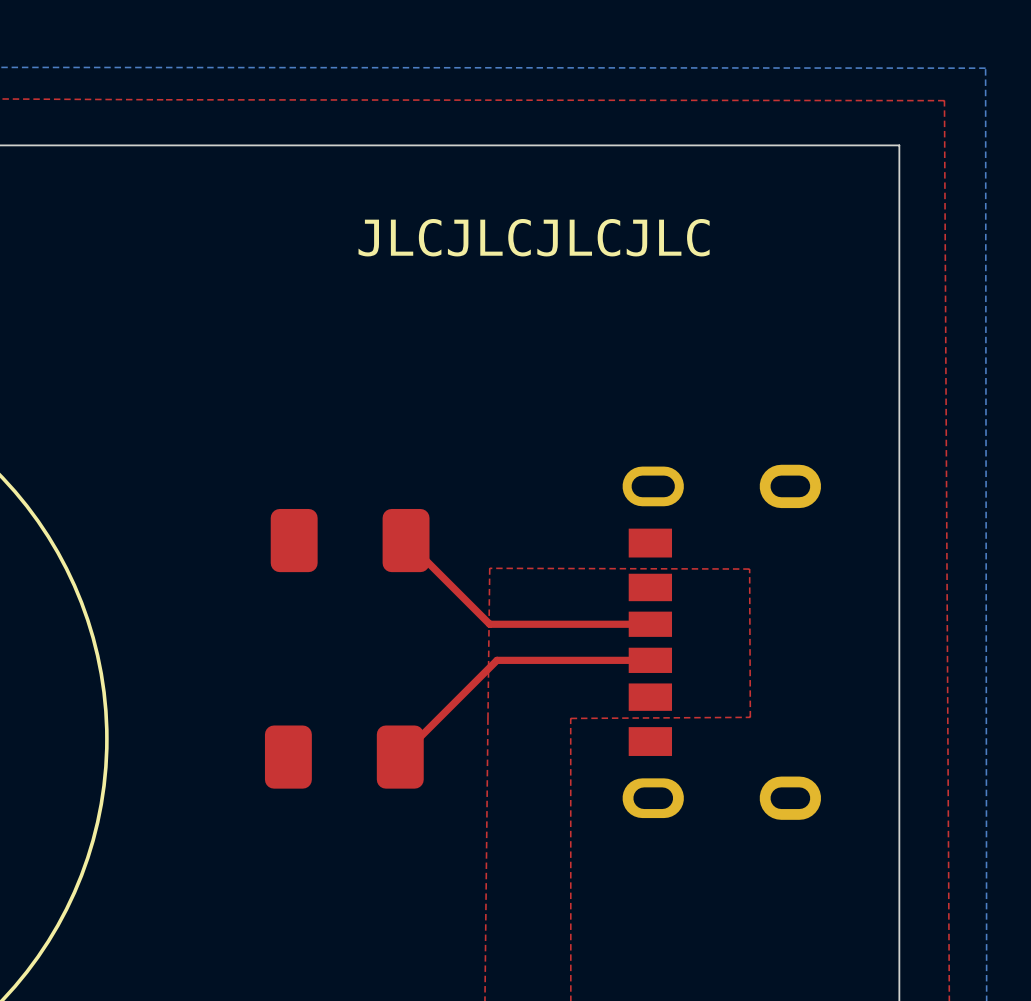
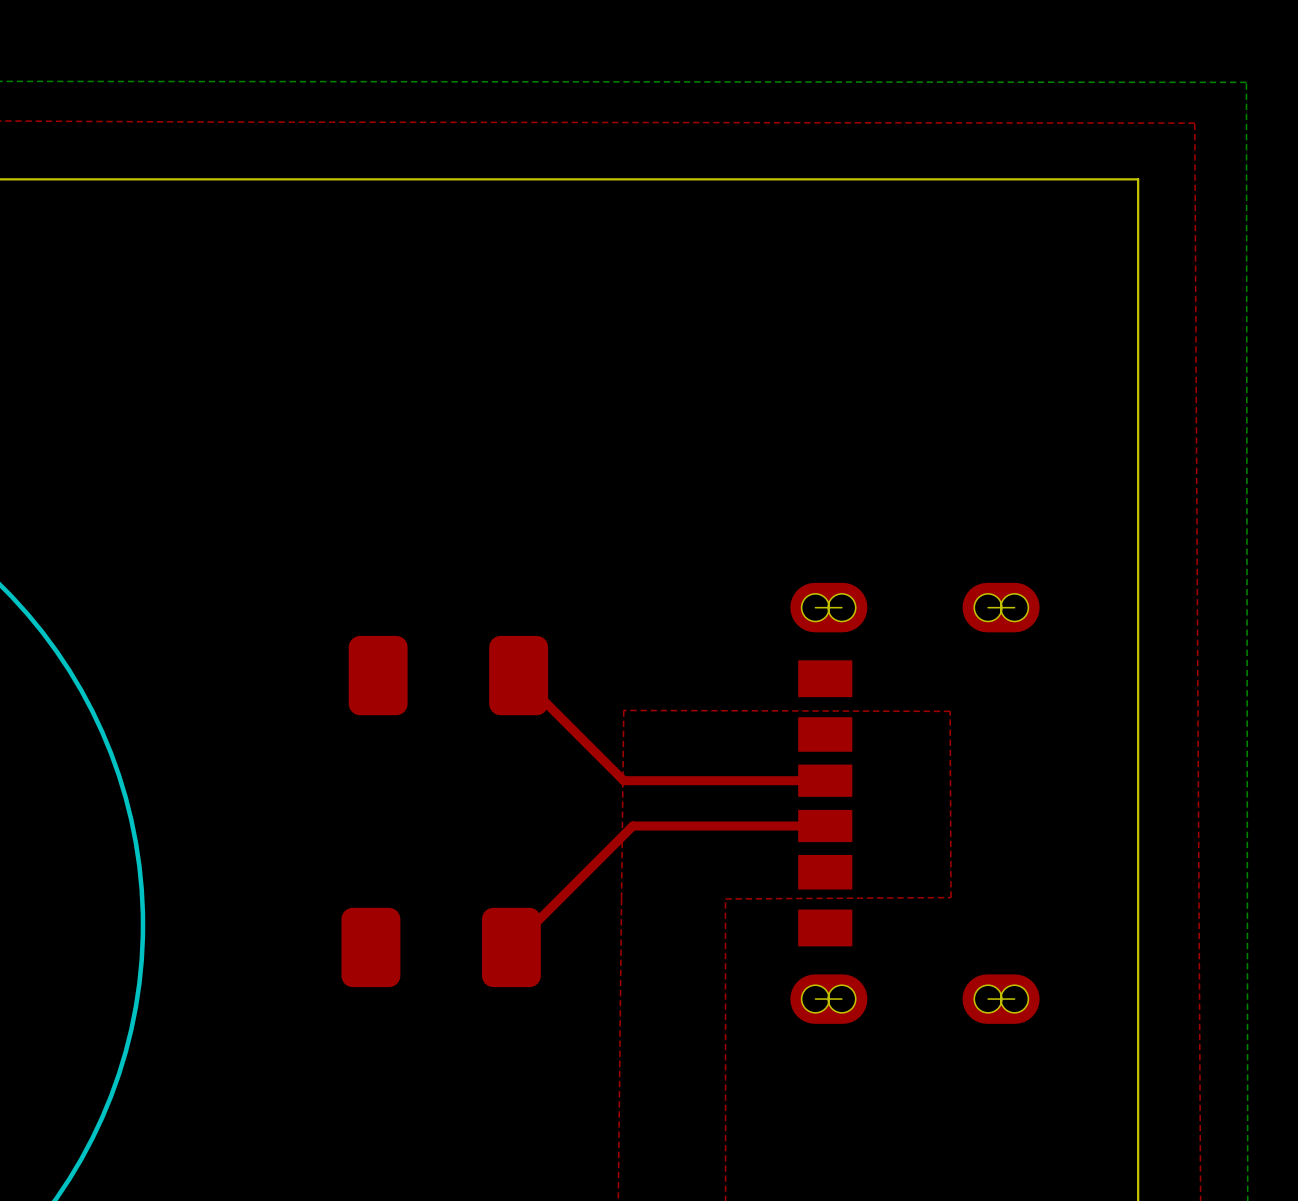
text: JLCJLCJLCJLC (534, 237) -> none
part footprint: [622, 464, 822, 820] -> [790, 582, 1040, 1024]

